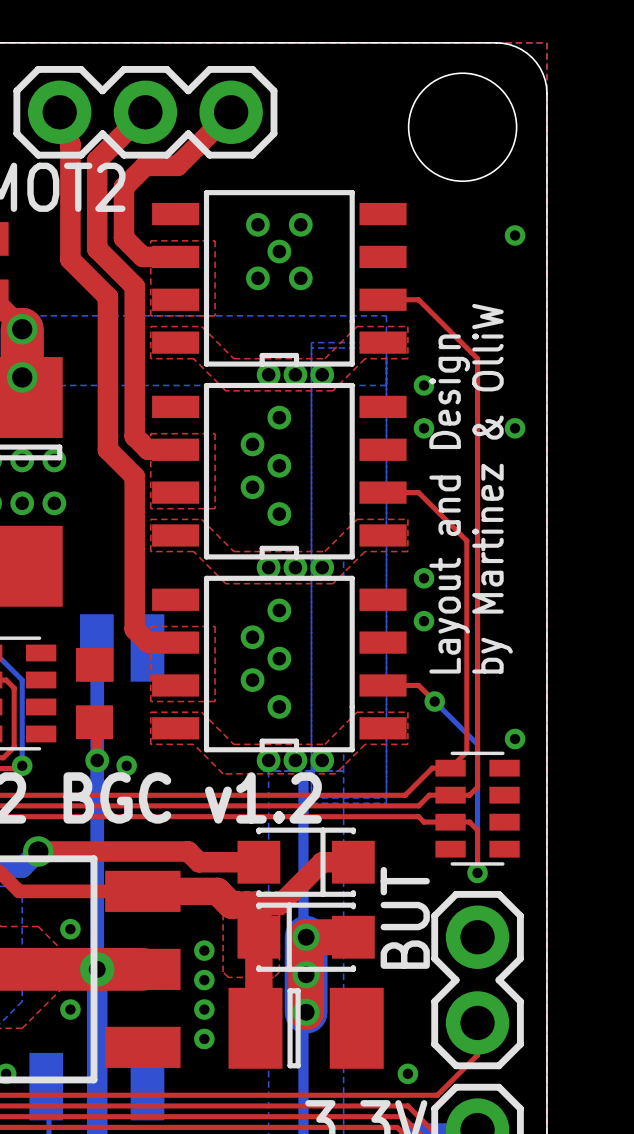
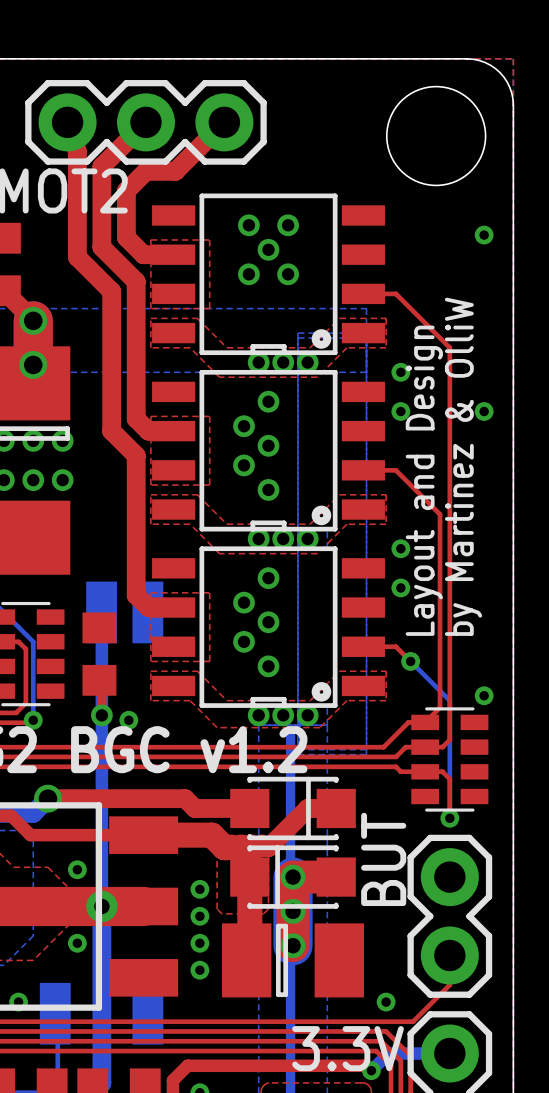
part footprint: [152, 190, 407, 367] -> [152, 193, 385, 356]
part footprint: [152, 382, 407, 560] -> [152, 369, 385, 532]
part footprint: [152, 575, 407, 753] -> [152, 546, 385, 708]

